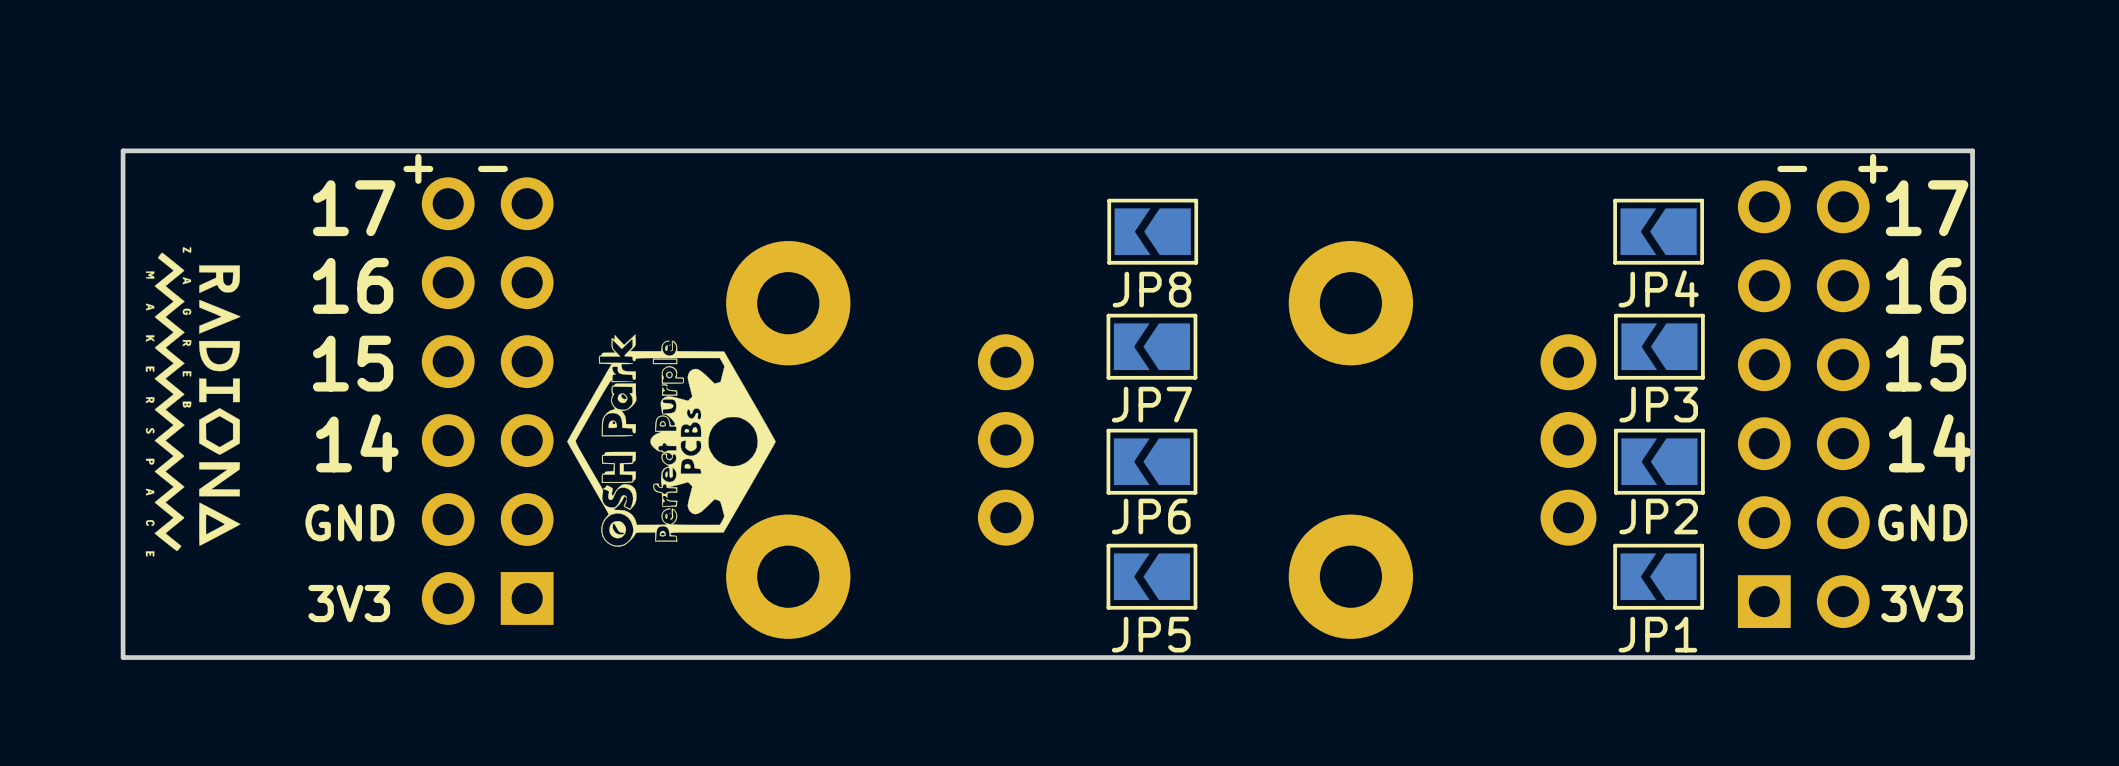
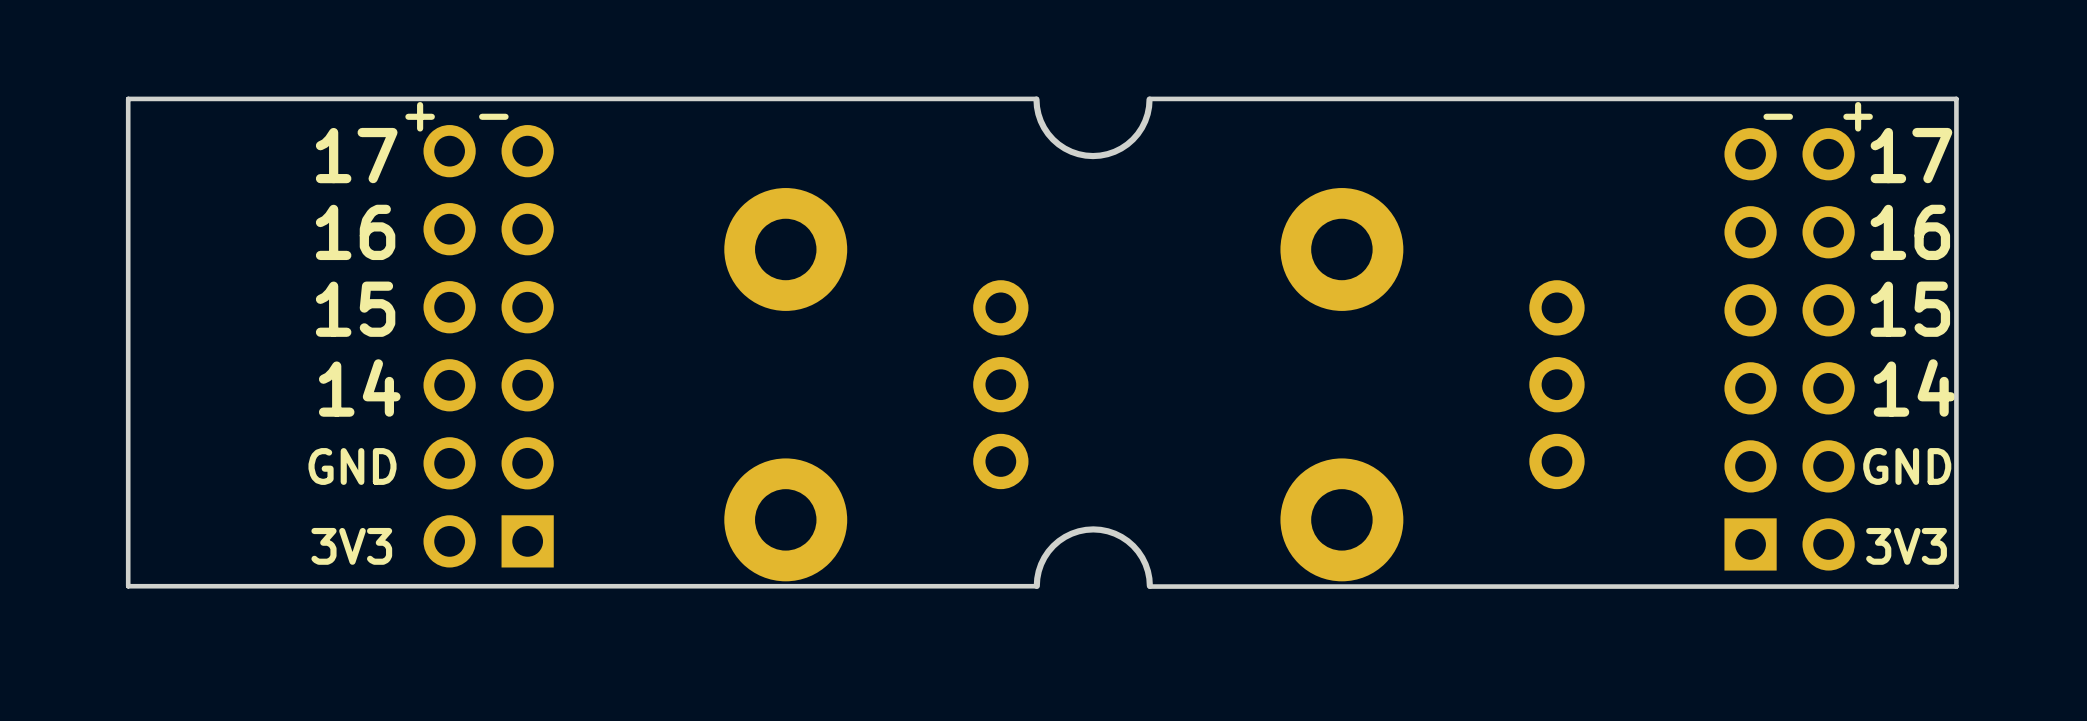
board edge: (1156, 150) (1042, 150) -> (1149, 99) (1145, 121) (1132, 139) (1114, 151) (1093, 156) (1071, 151) (1053, 139) (1040, 121) (1036, 99)
JP8: (1152, 231) -> none
JP4: (1658, 231) -> none
drawing: [145, 247, 241, 557] -> none
drawing: [567, 334, 776, 547] -> none
JP7: (1151, 346) -> none
JP3: (1659, 346) -> none
JP6: (1151, 461) -> none
JP2: (1659, 461) -> none
JP5: (1151, 576) -> none
JP1: (1658, 576) -> none
board edge: (123, 643) (123, 657) (1972, 657) (1972, 644) -> (128, 586) (1037, 586)
board edge: none -> (1149, 585) (1145, 564) (1133, 545) (1114, 533) (1093, 529) (1071, 533) (1053, 545) (1041, 564) (1036, 585)
board edge: none -> (1956, 586) (1149, 586)

